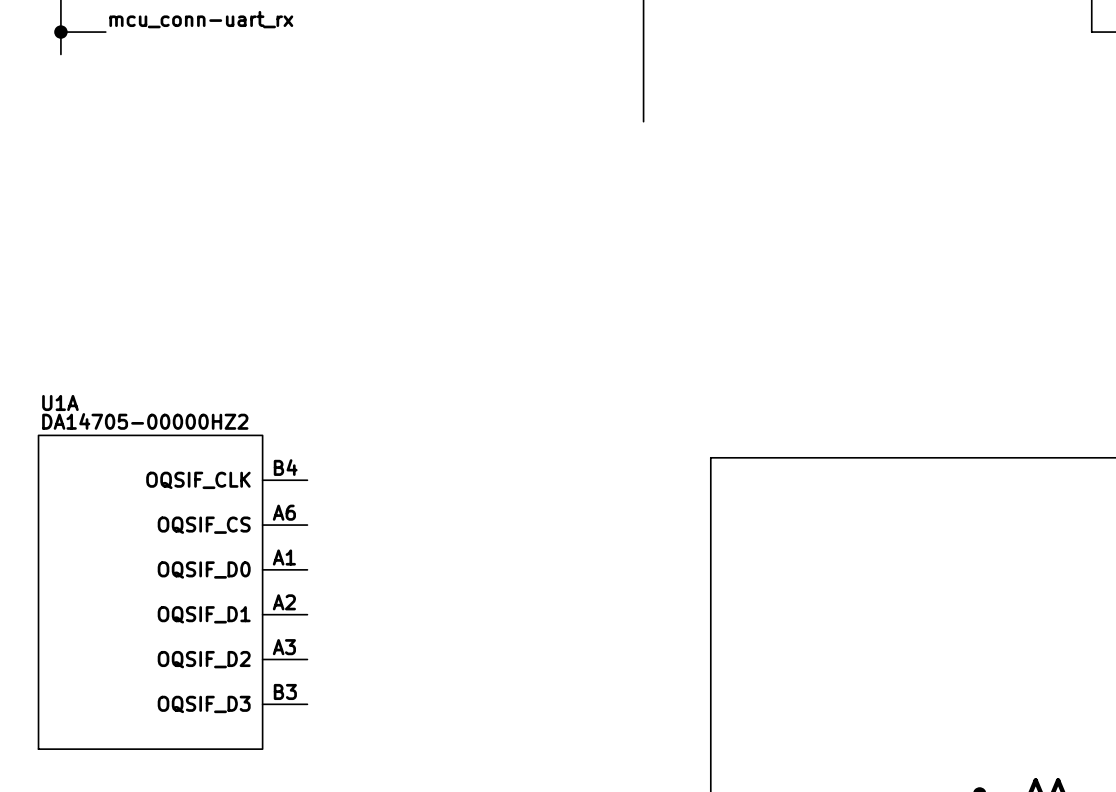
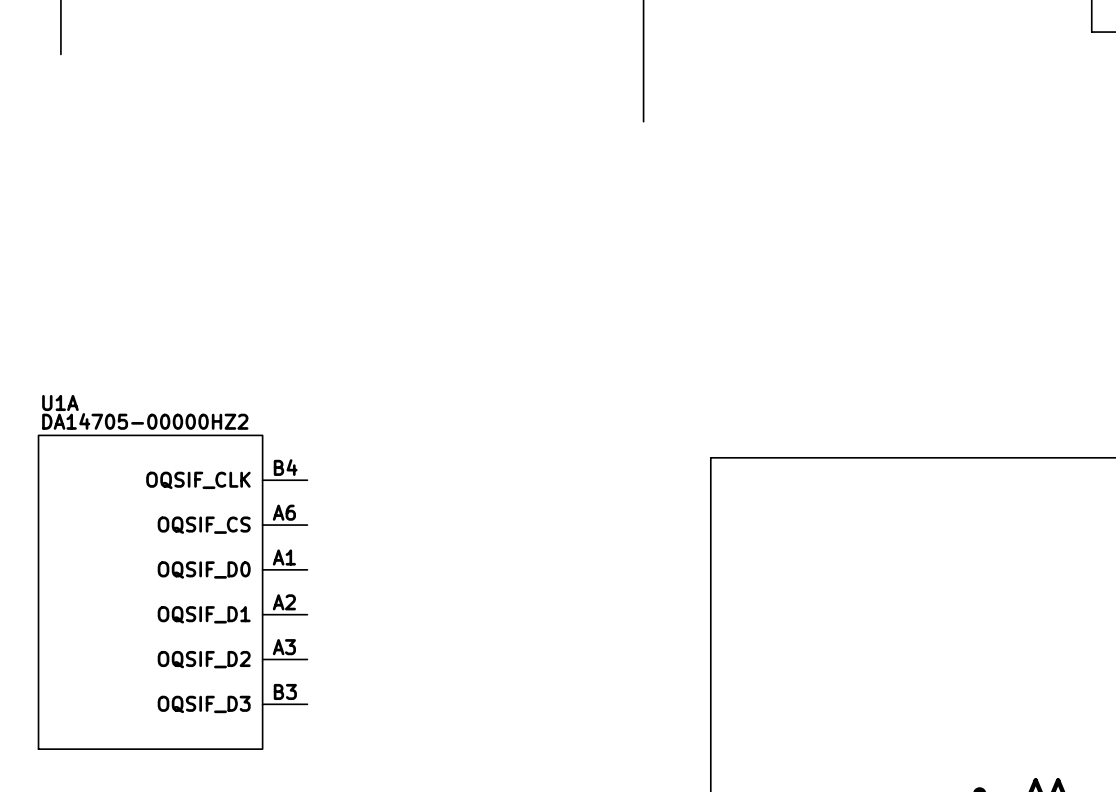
label: mcu_conn-uart_rx (201, 19) -> none
wire: (60, 32) (105, 32) -> none
junction: (60, 32) -> none

